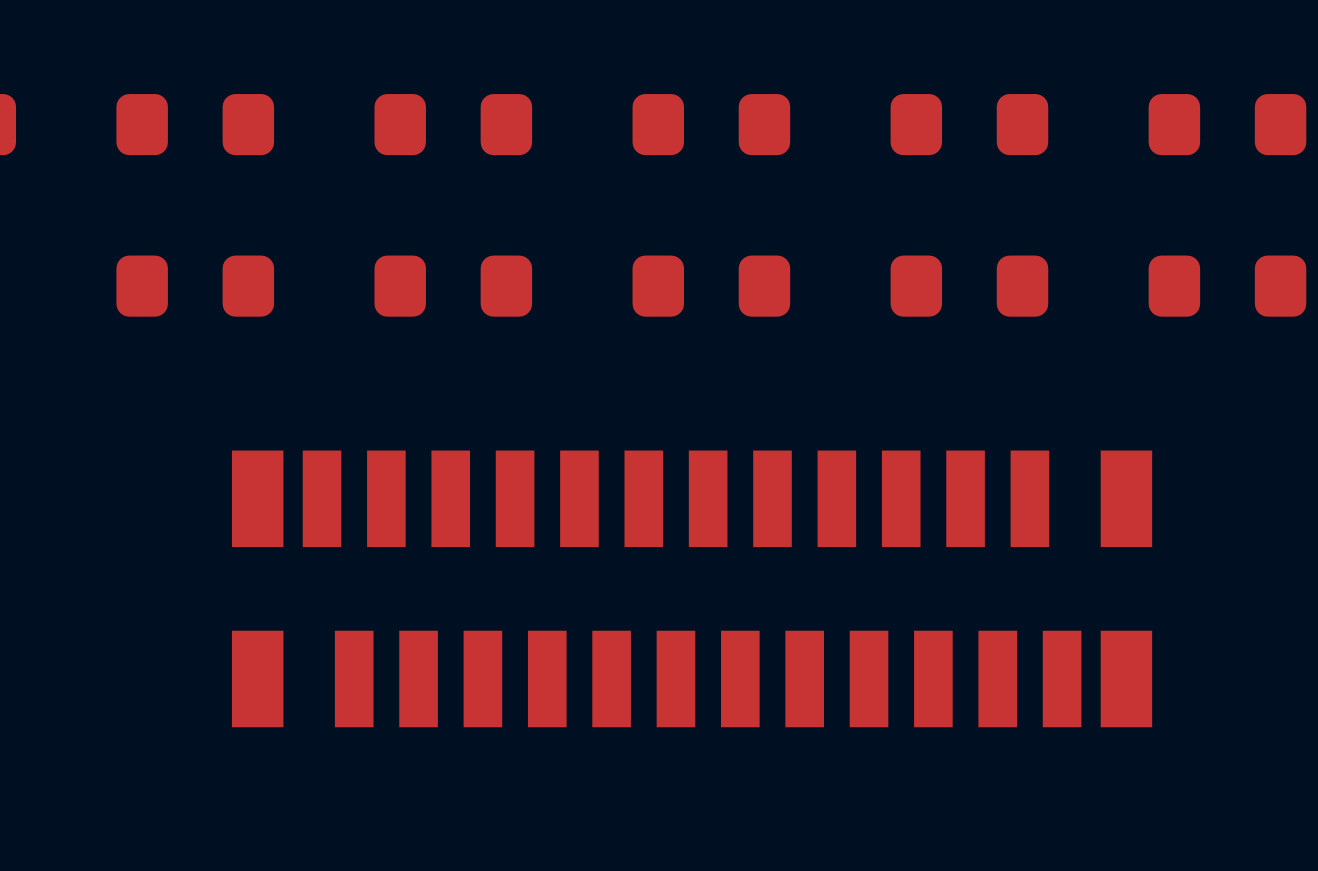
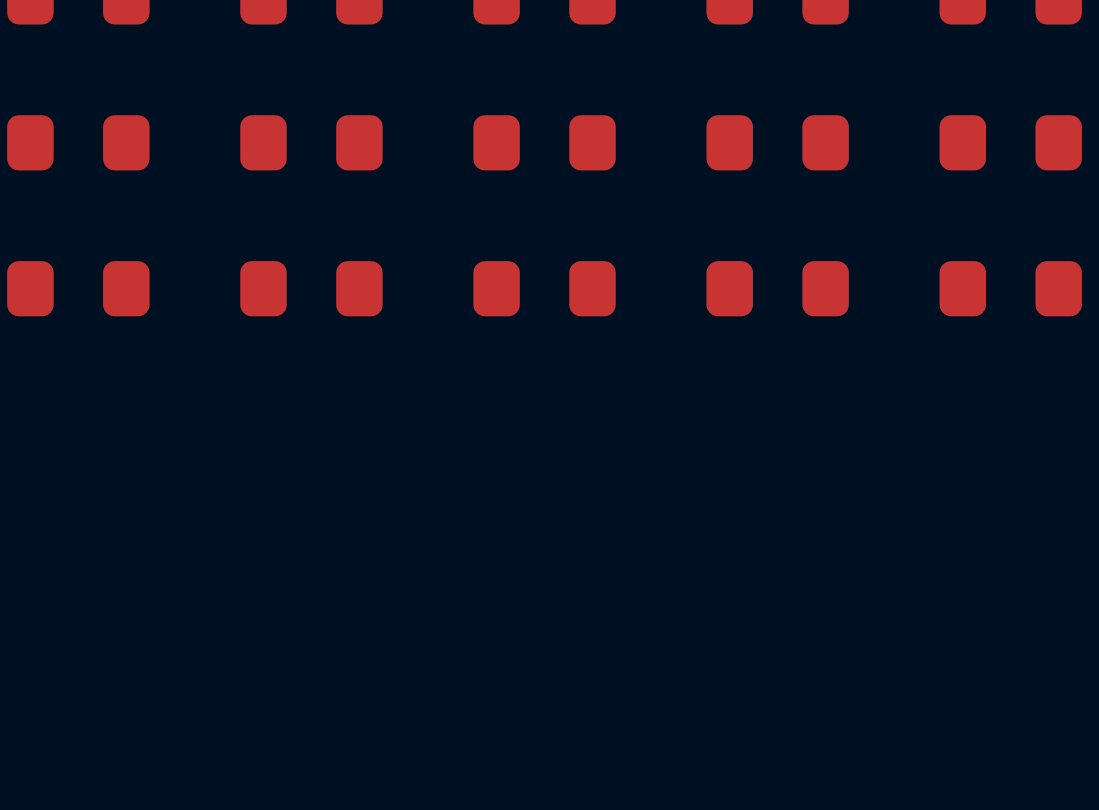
part: (692, 588) -> none

